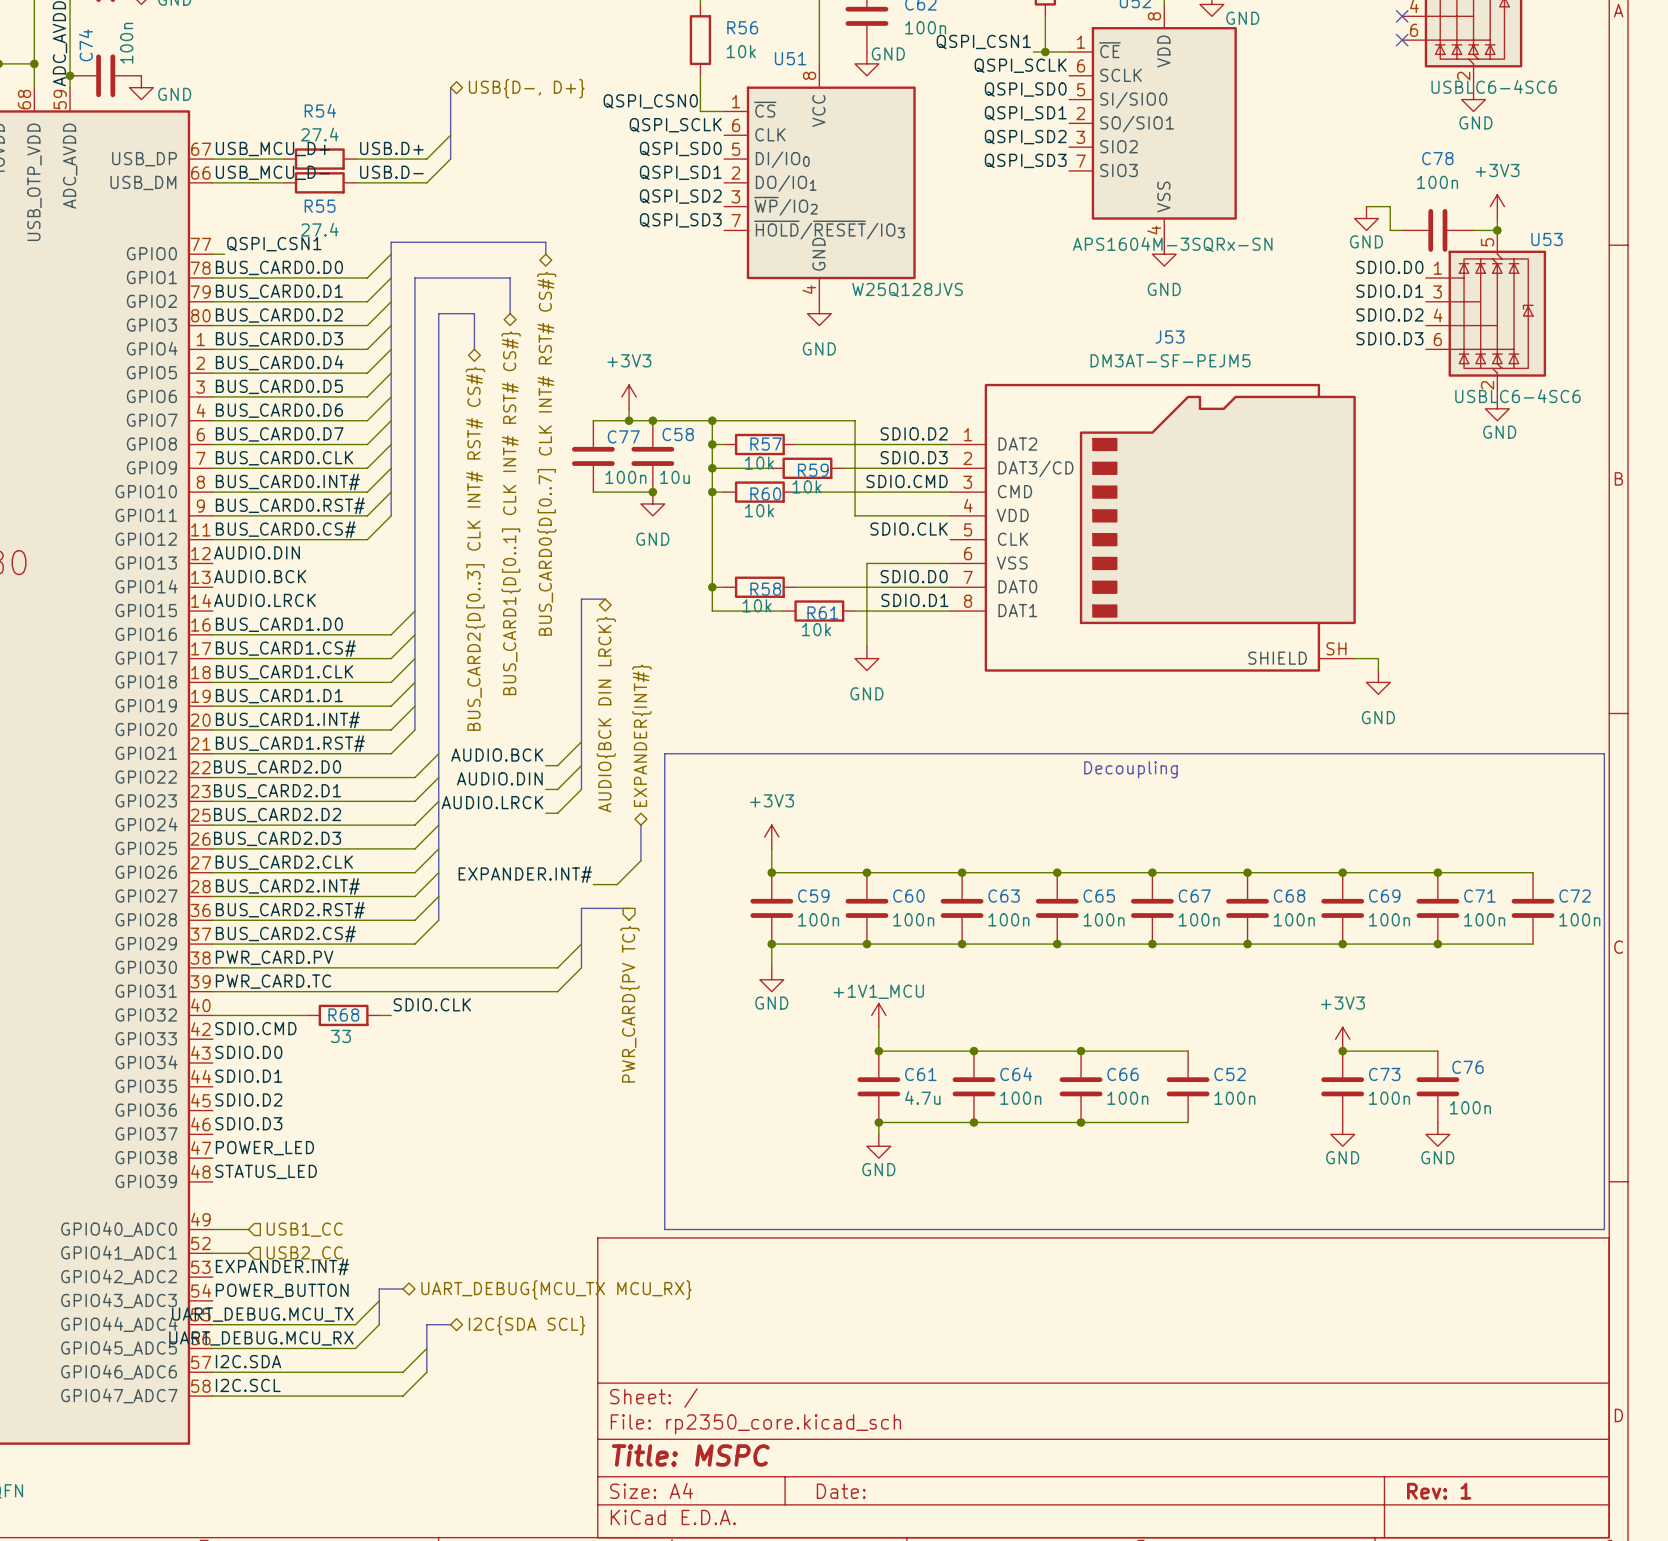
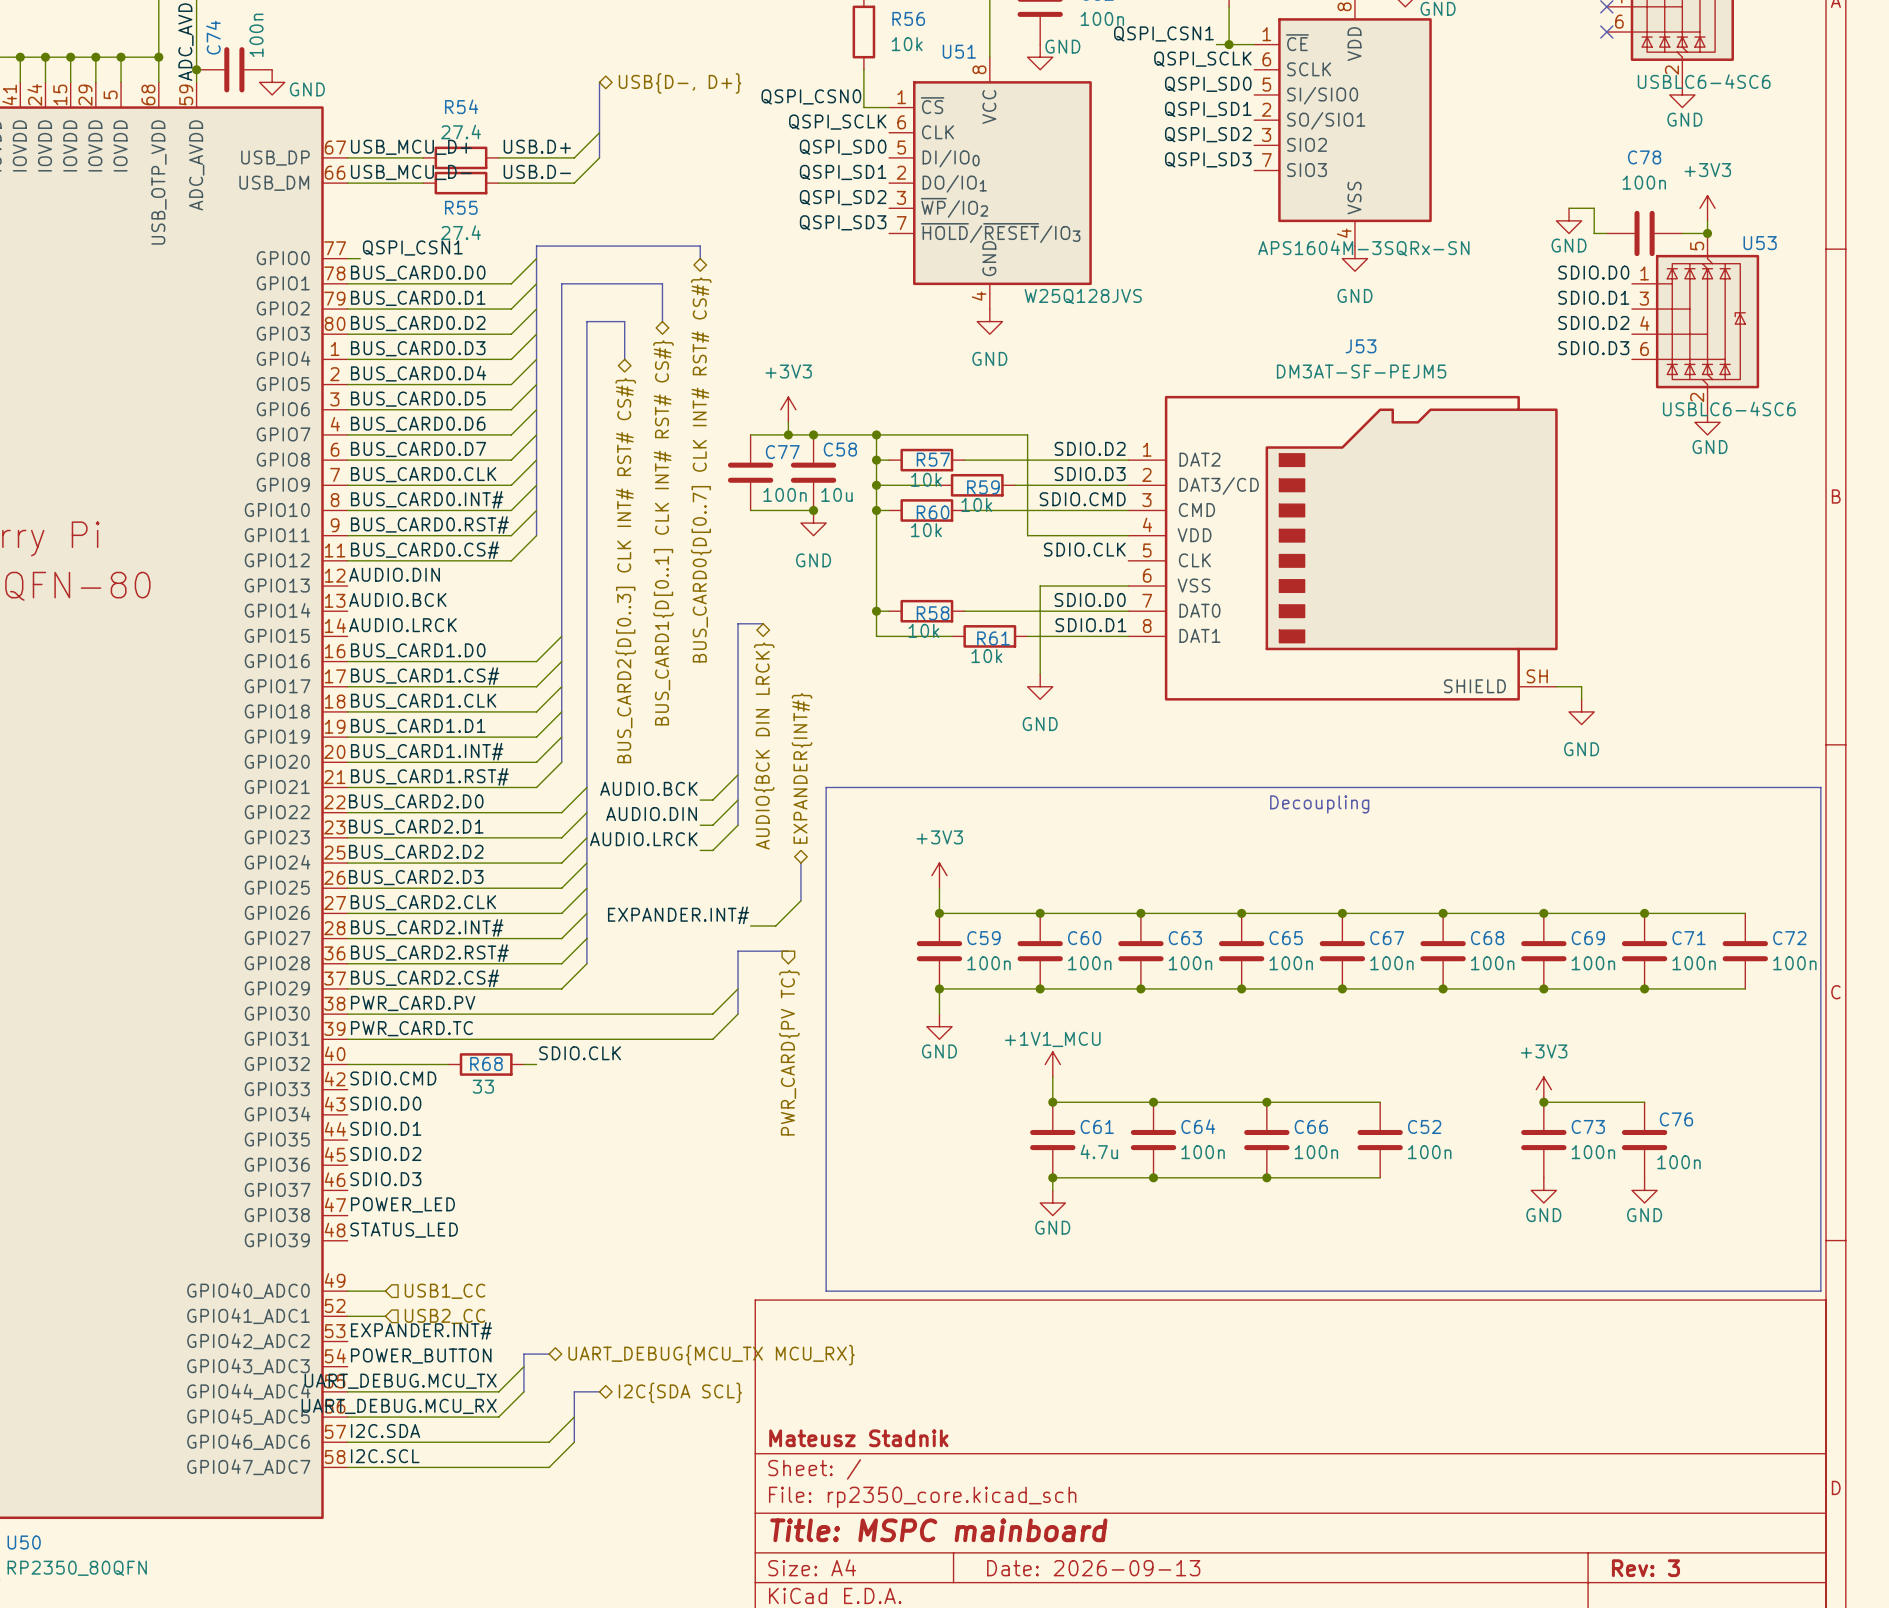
title block: none -> Mateusz Stadnik (858, 1438)
title block: Title: MSPC (690, 1455) -> Title: MSPC mainboard (938, 1530)
title block: Date: (841, 1491) -> Date: 2026-09-13 (1093, 1568)
title block: Rev: 1 (1439, 1491) -> Rev: 3 (1645, 1568)

